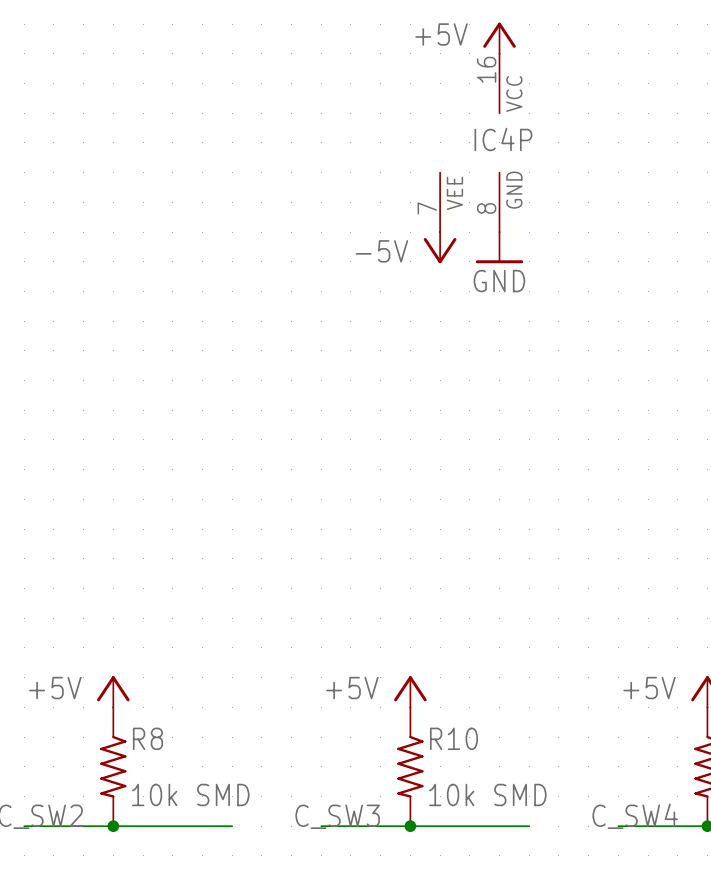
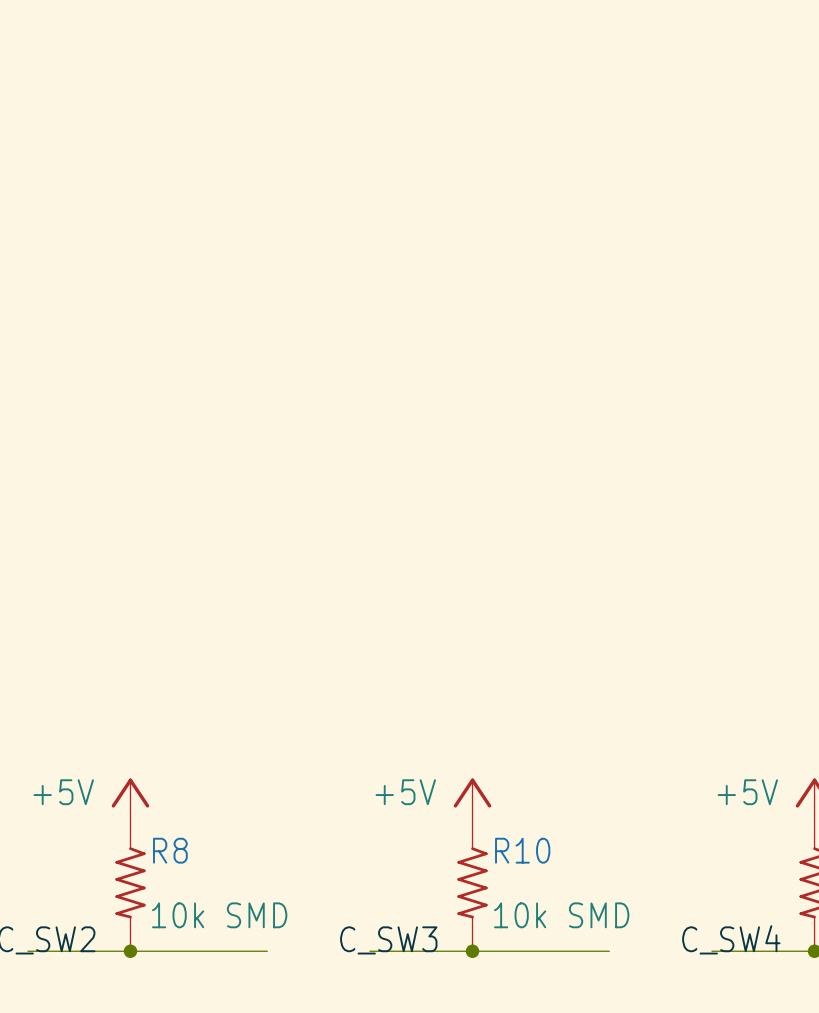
power symbol: +5V (499, 38) -> none
IC4P: (469, 142) -> none
power symbol: -5V (440, 247) -> none
power symbol: GND (499, 247) -> none

